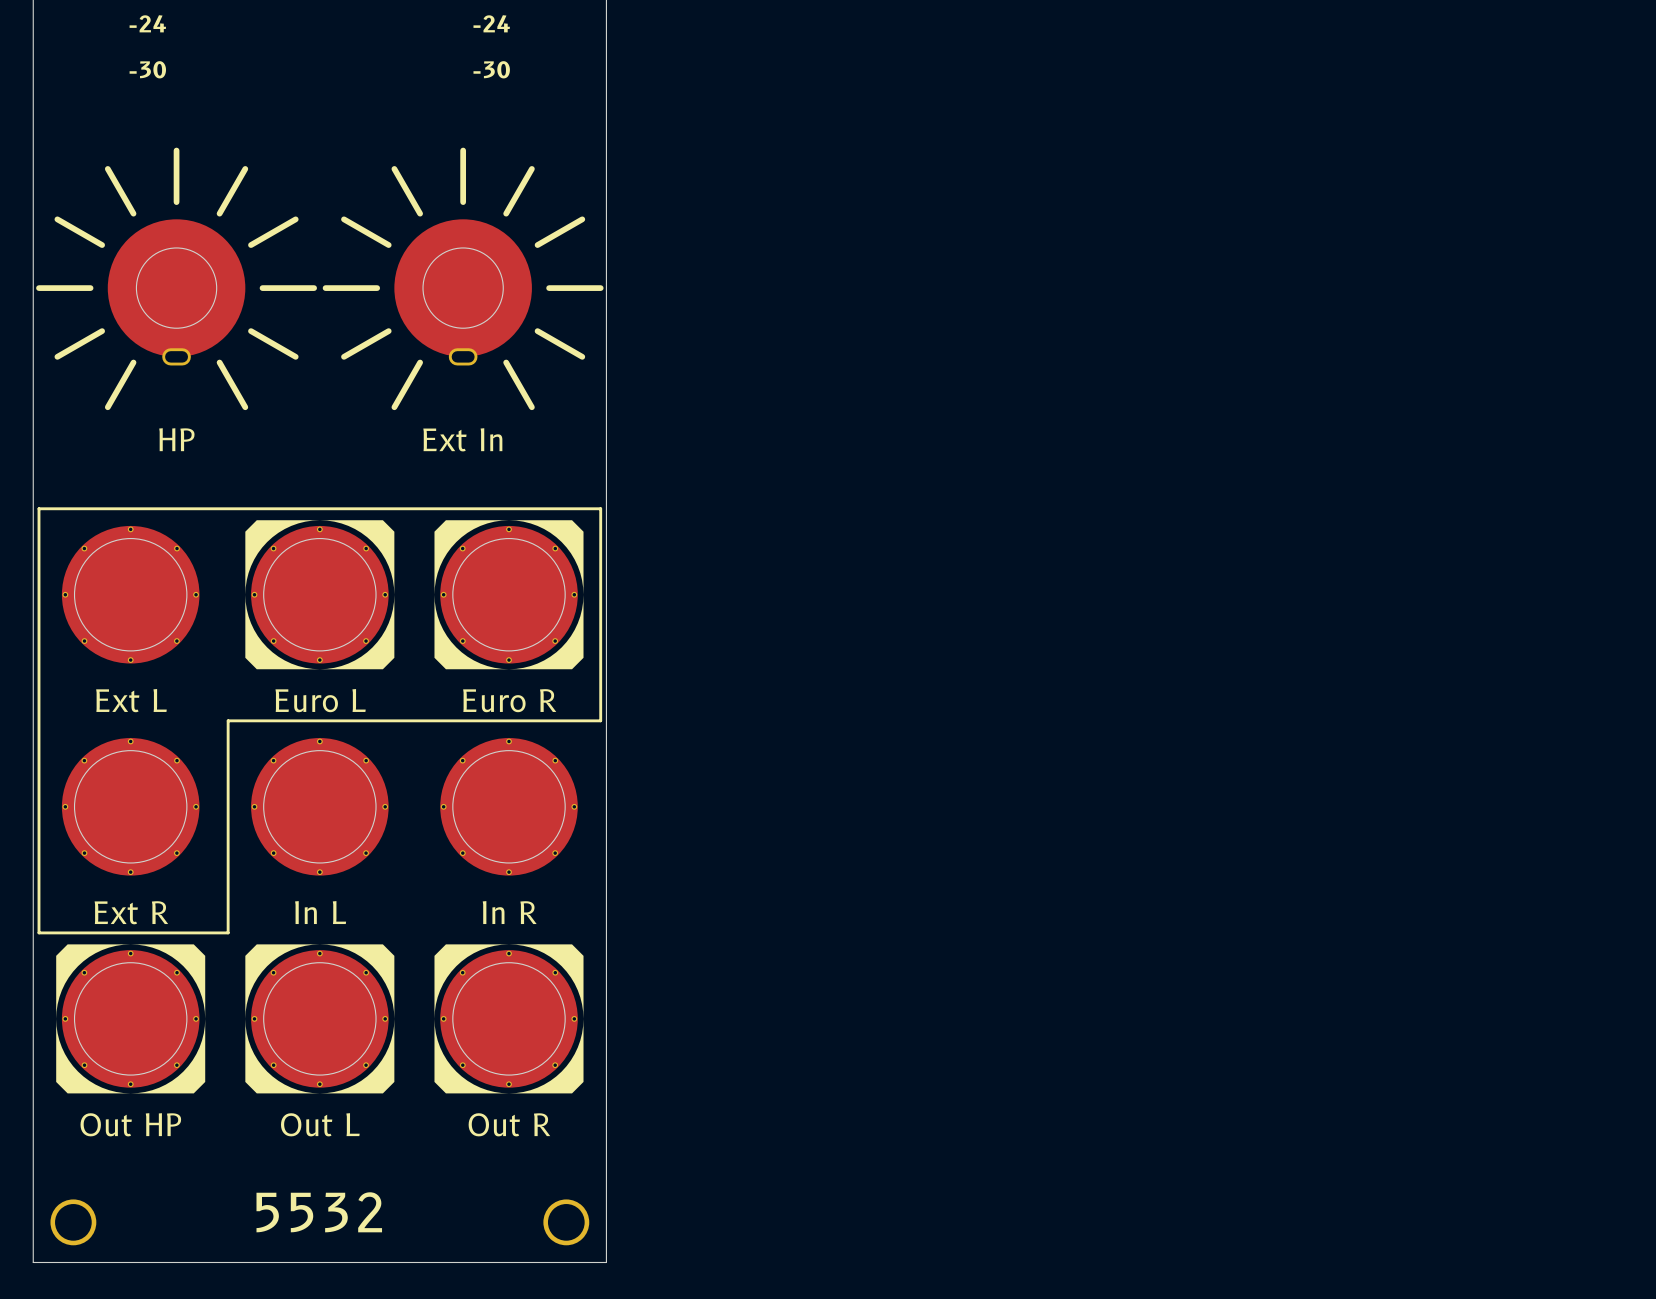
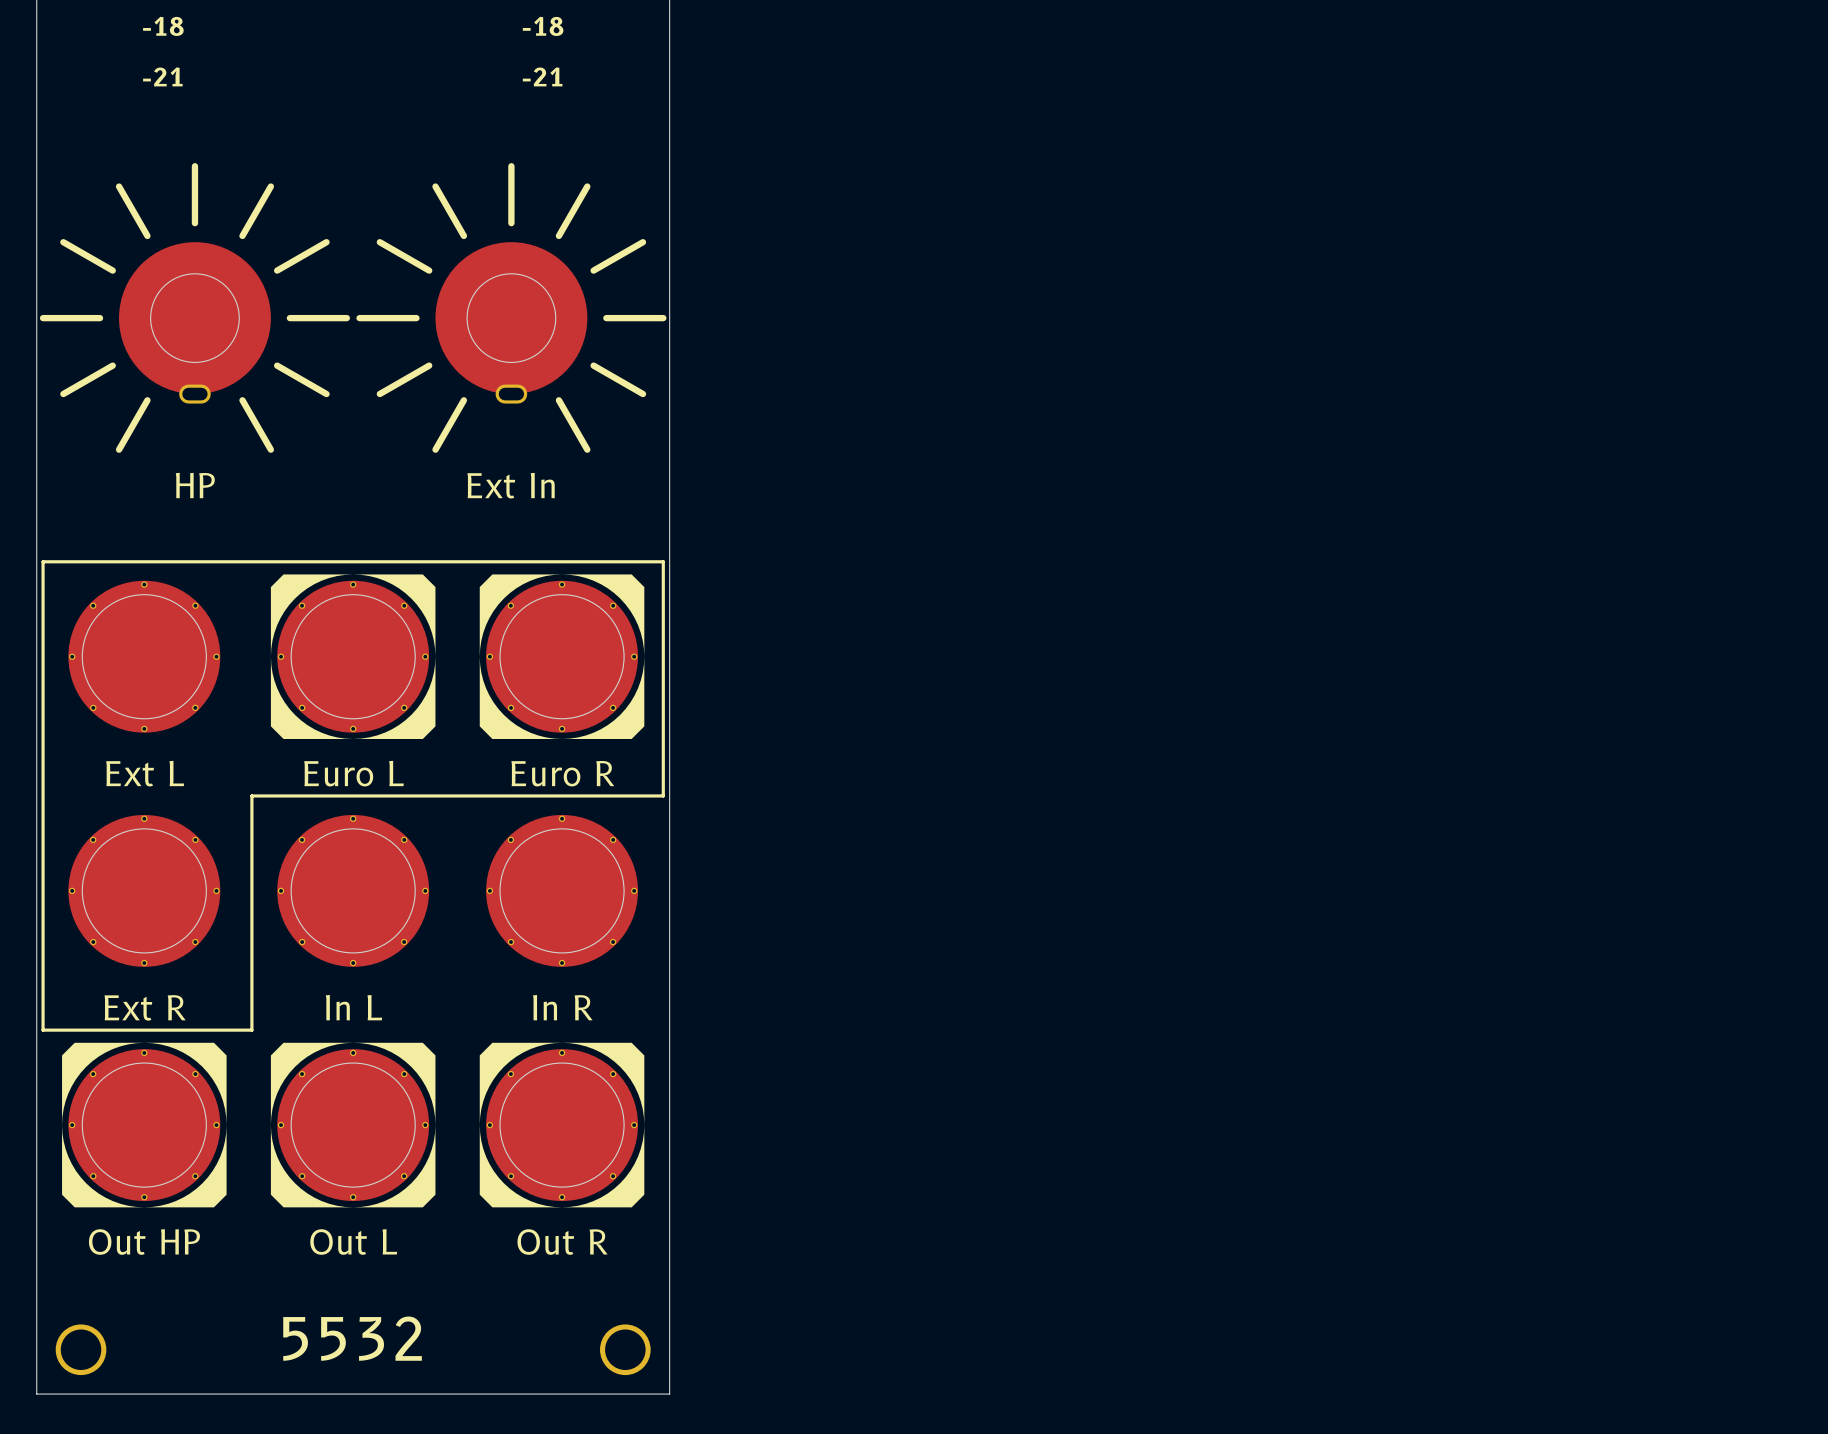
text: -24 (147, 23) -> -18 (163, 26)
text: -24 (491, 23) -> -18 (543, 26)
text: -30 (147, 69) -> -21 (162, 76)
text: -30 (491, 69) -> -21 (542, 76)

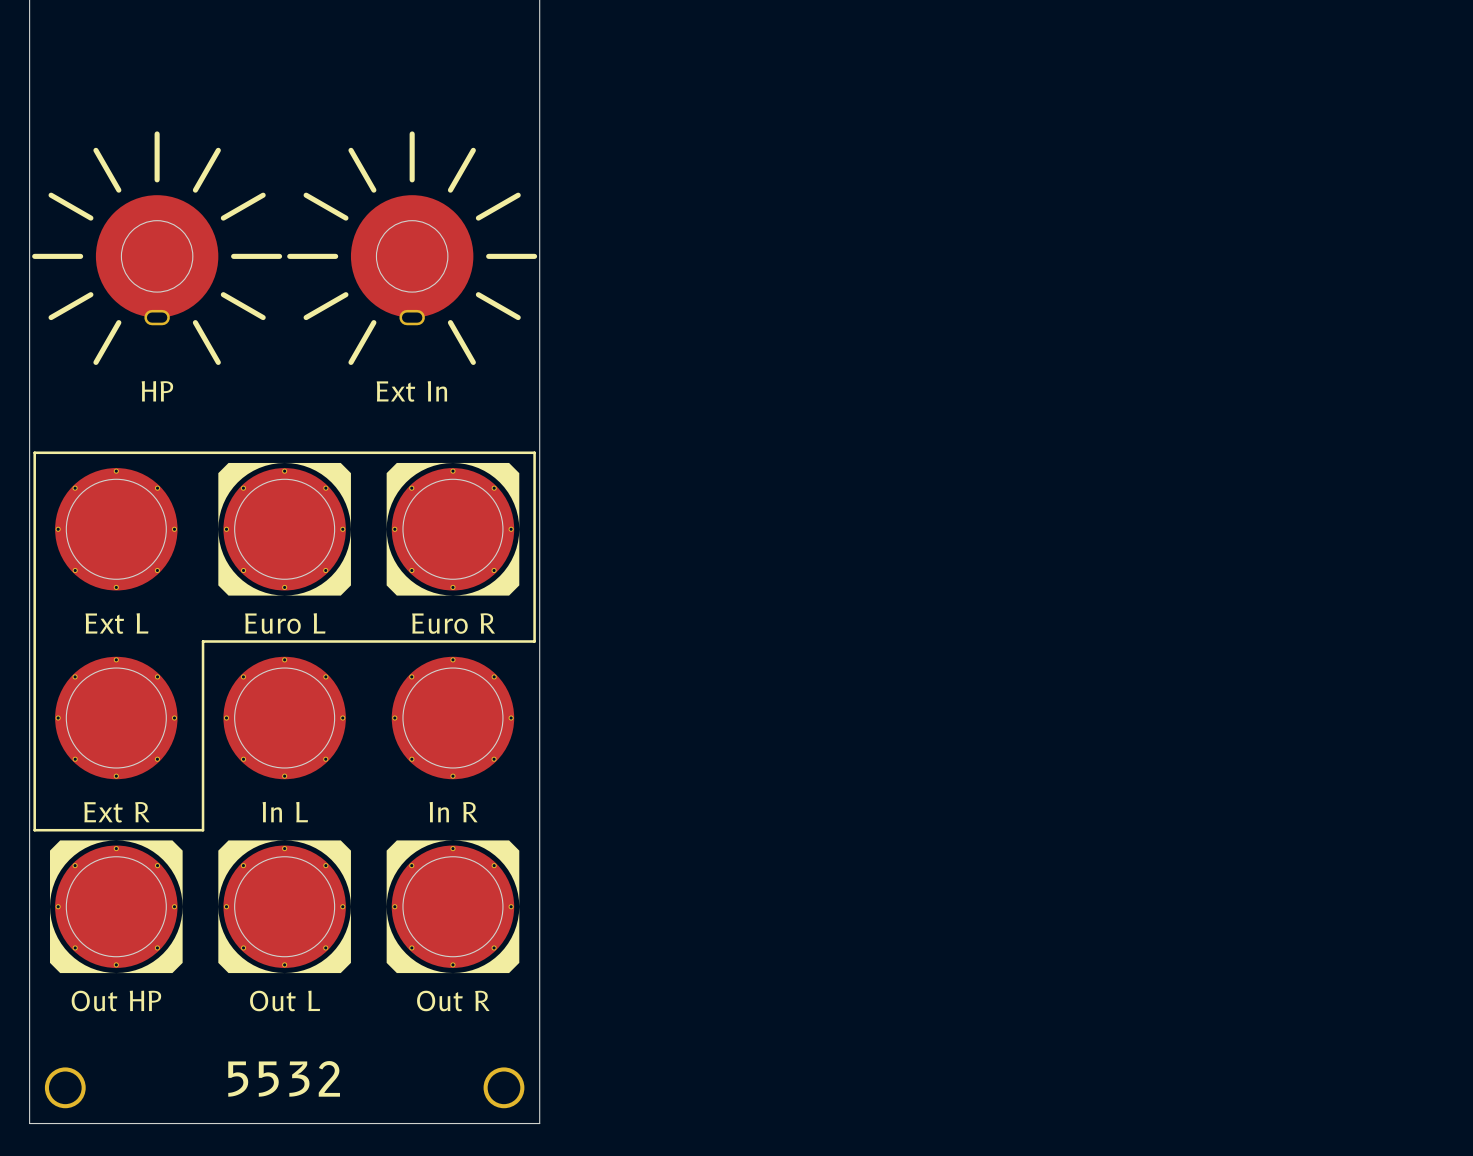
text: -18 (163, 26) -> none
text: -18 (543, 26) -> none
text: -21 (162, 76) -> none
text: -21 (542, 76) -> none

